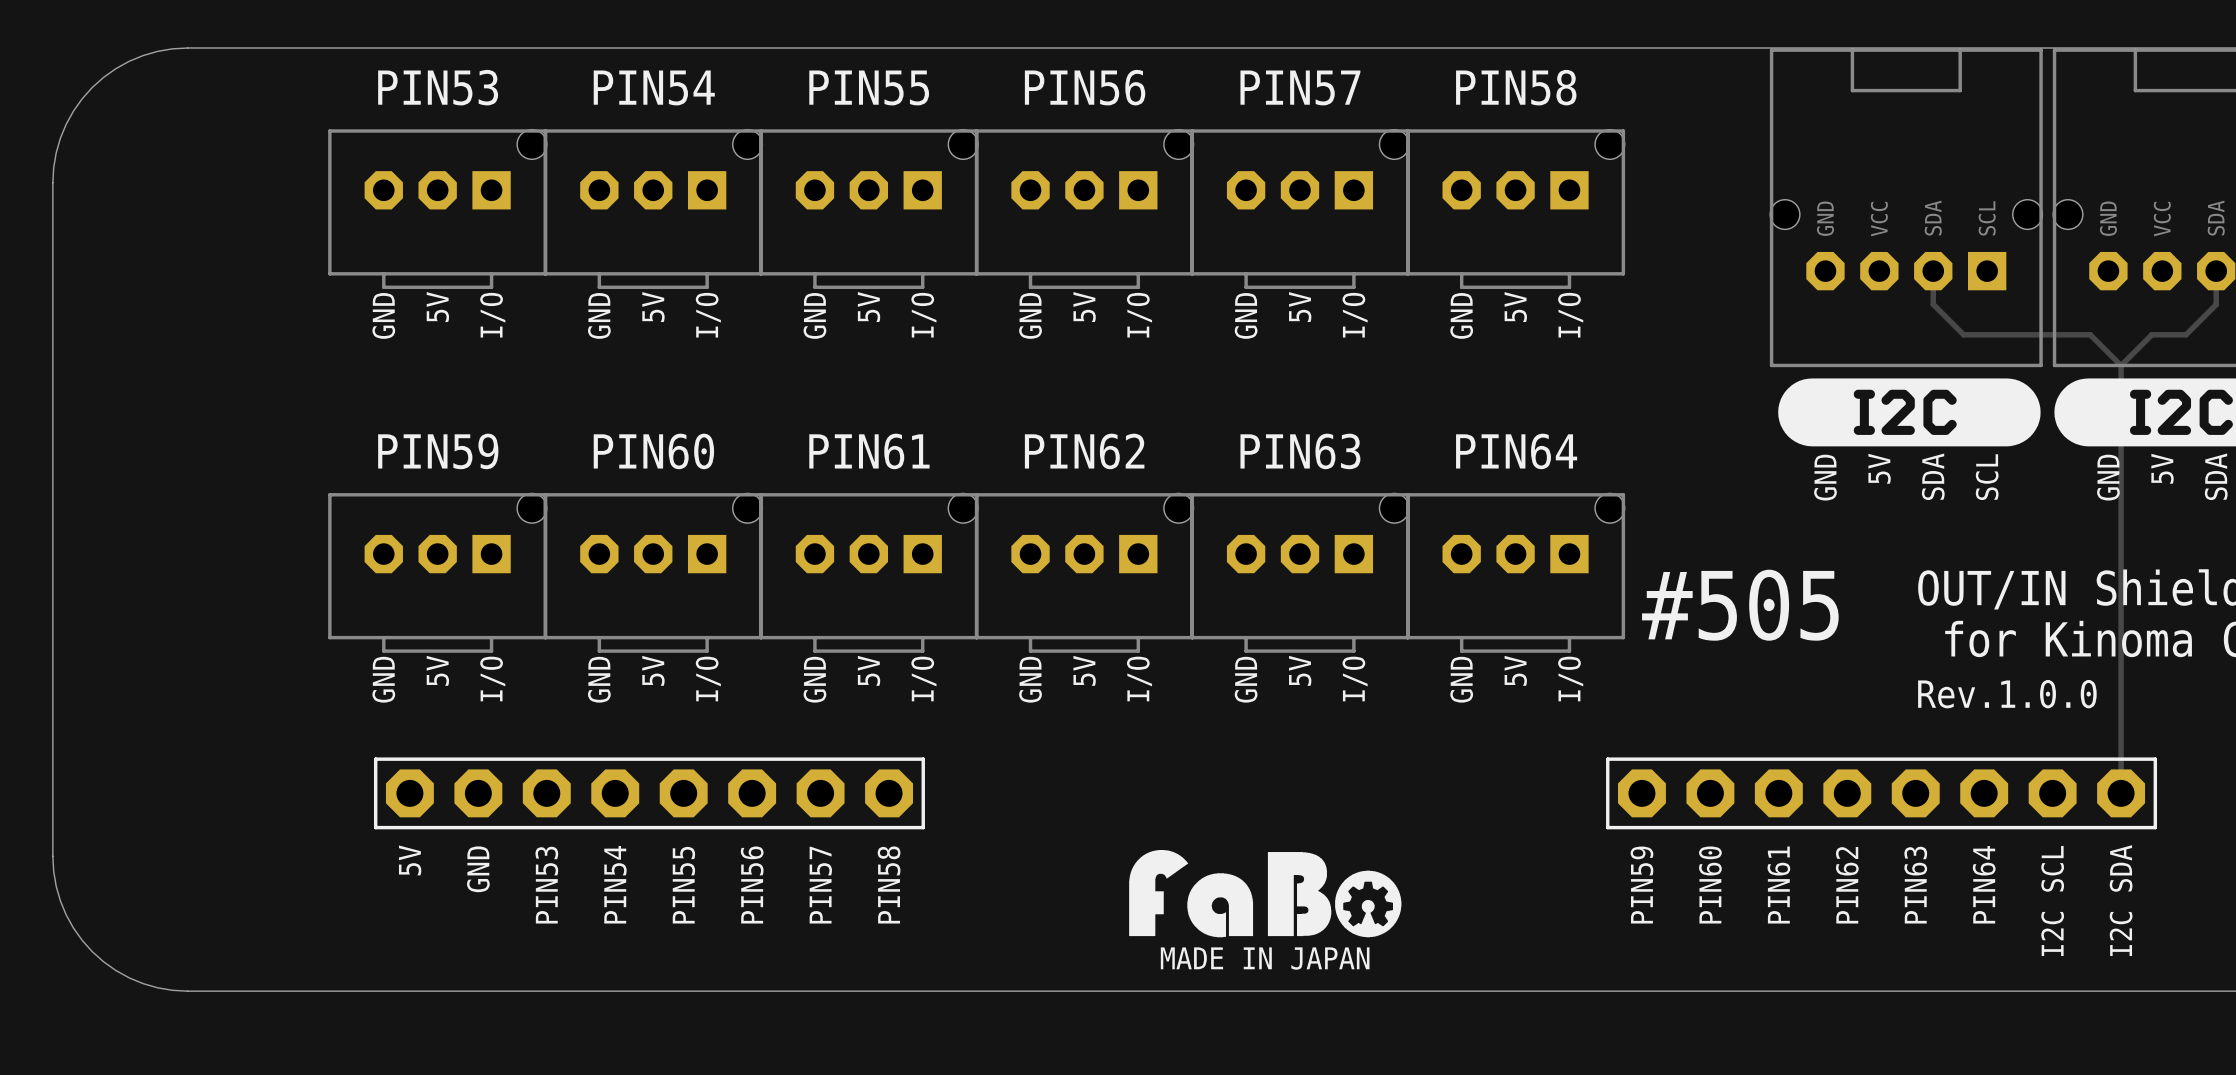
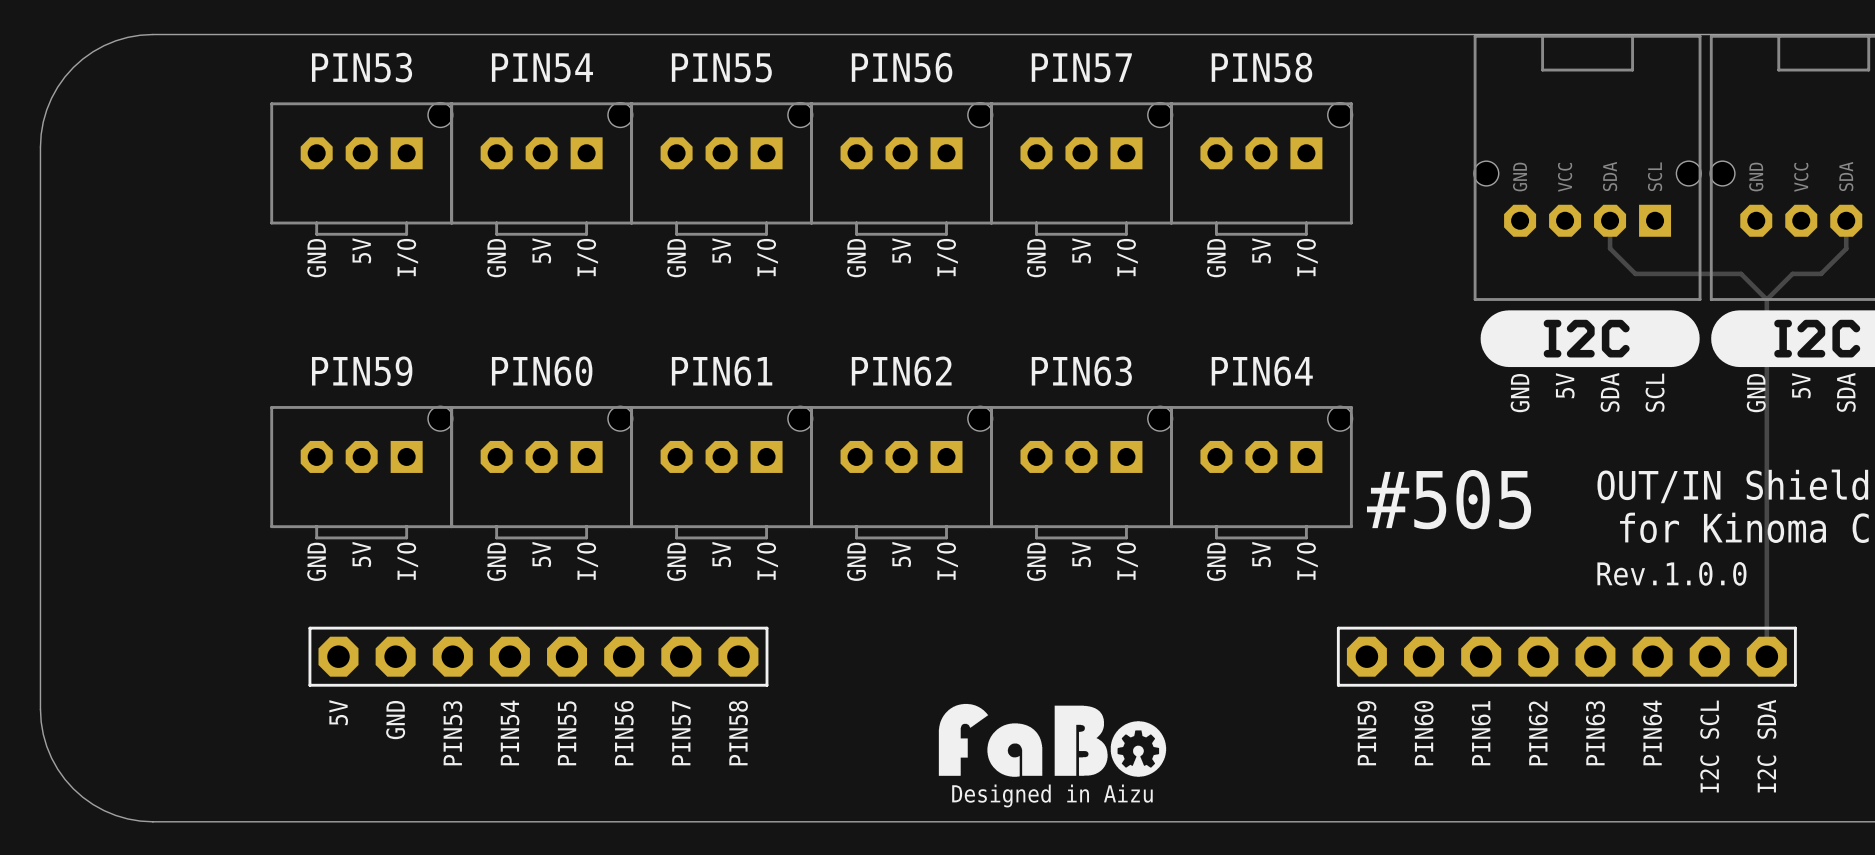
text: MADE IN JAPAN (1265, 958) -> Designed in Aizu (1052, 795)

